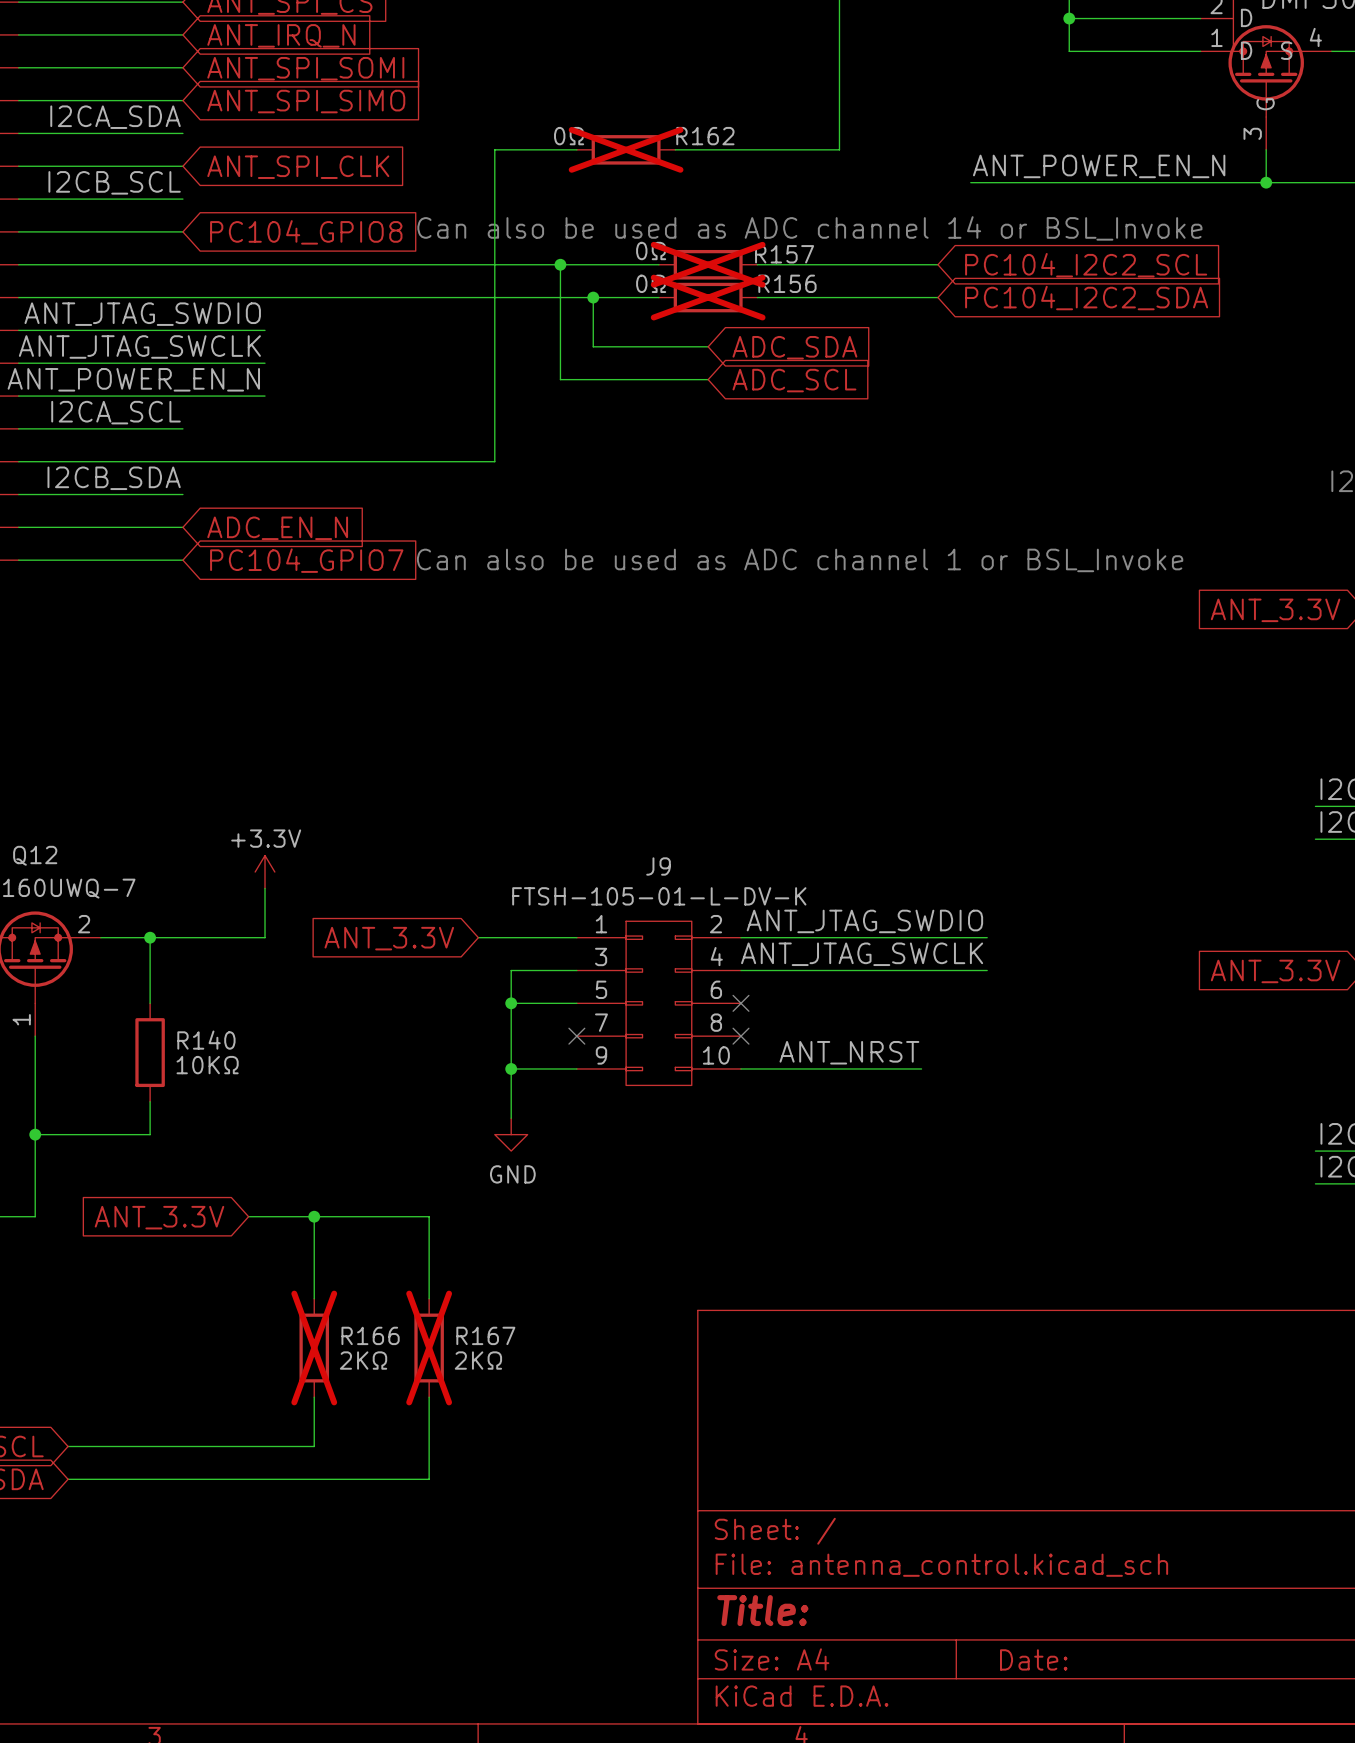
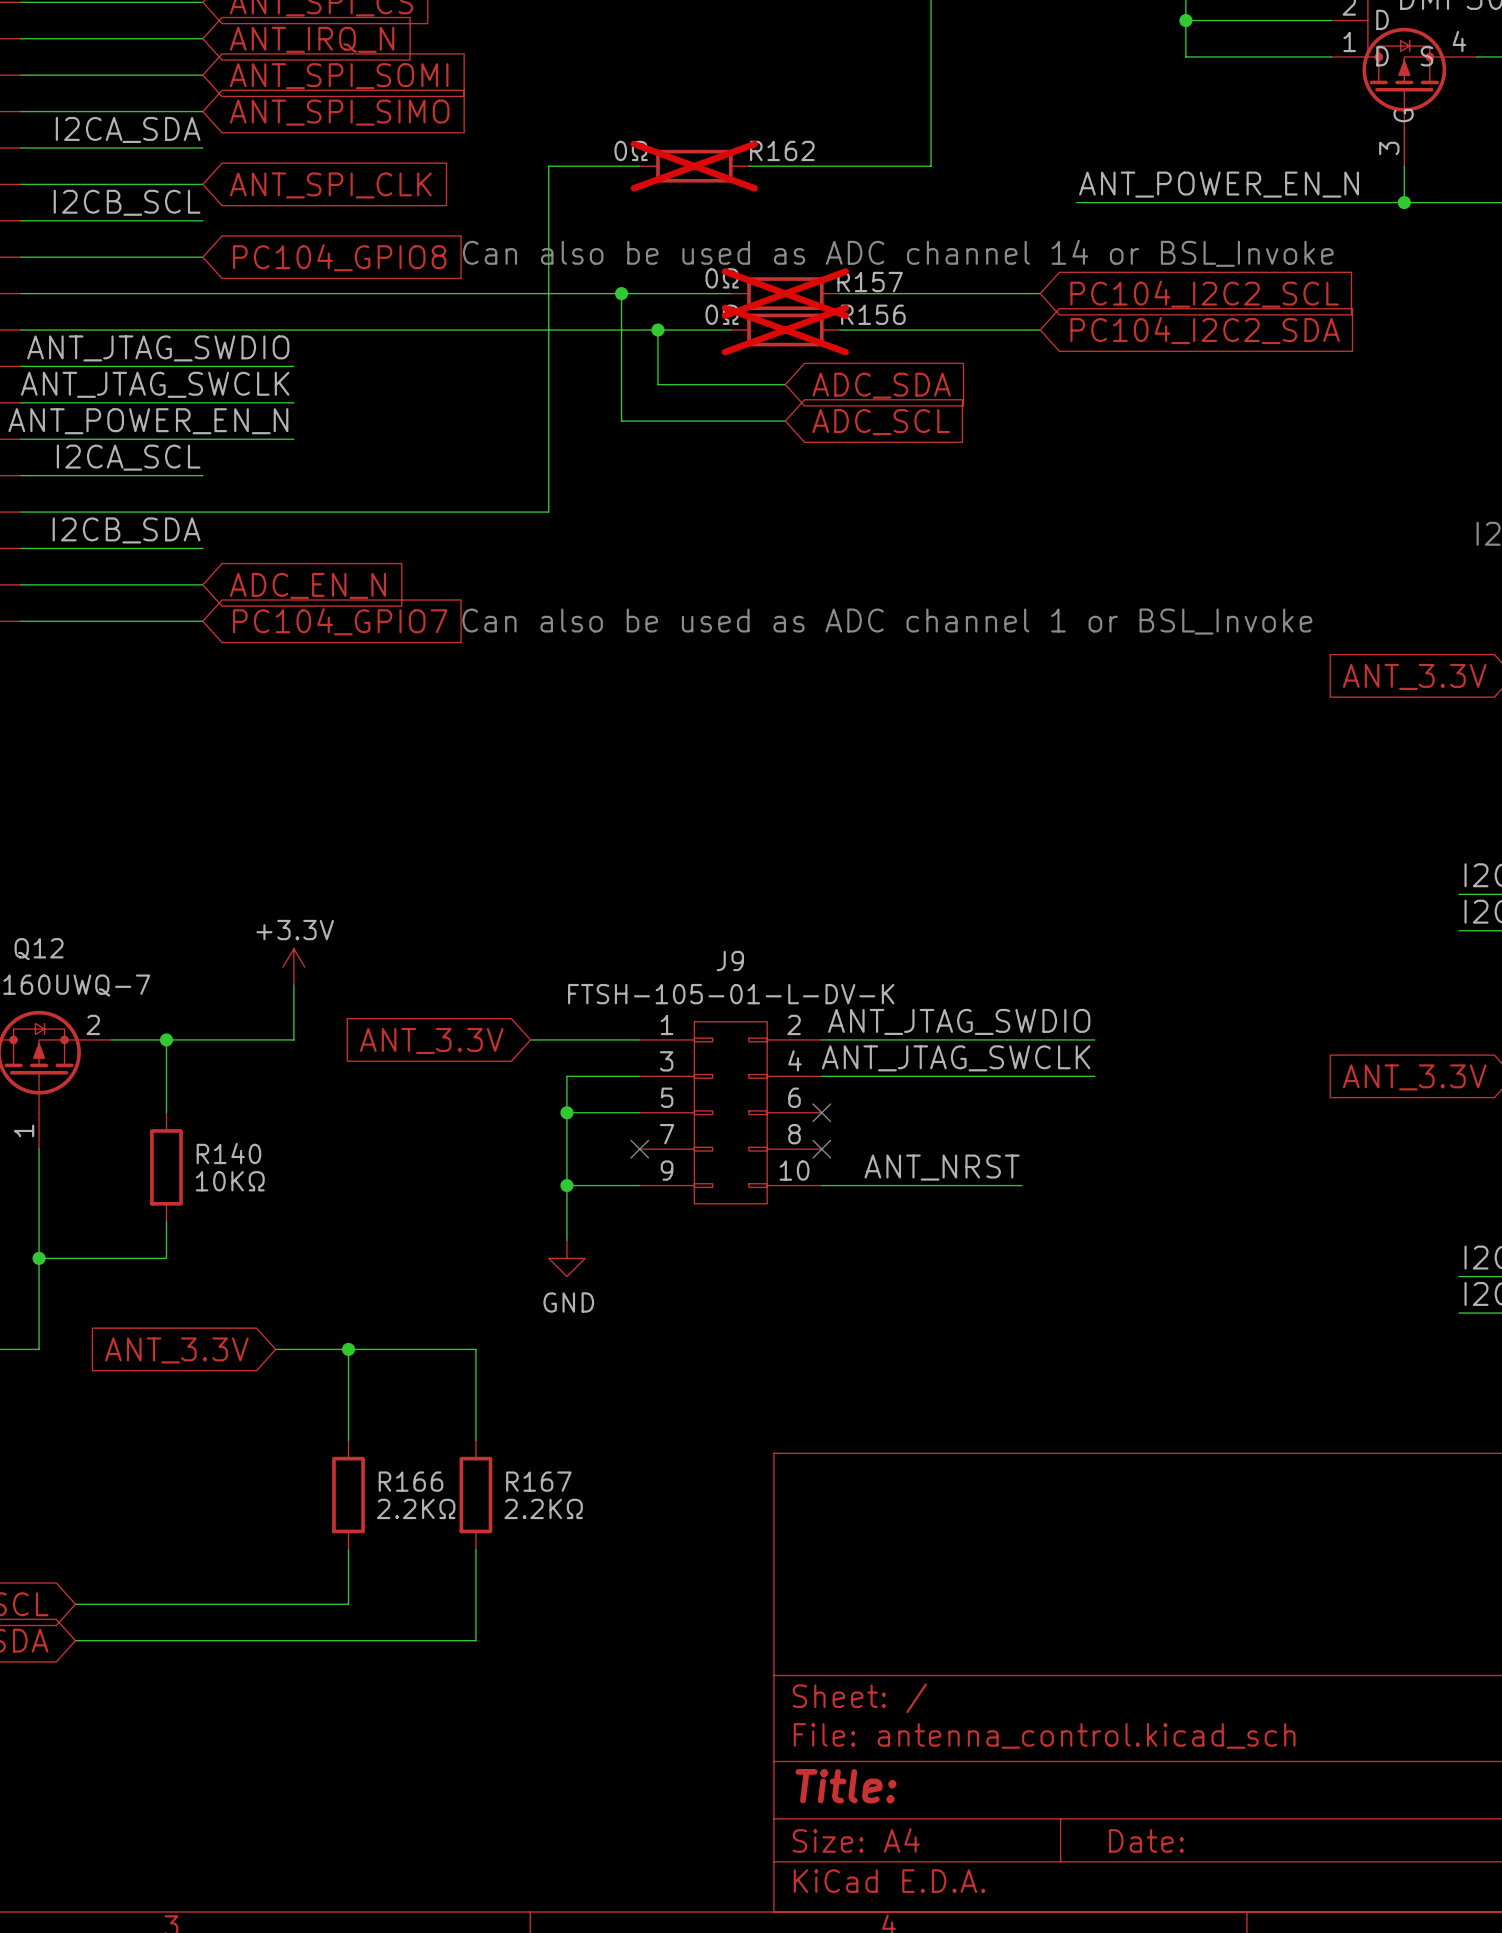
R166 do-not-place cross: (314, 1348) -> none
R167 do-not-place cross: (429, 1348) -> none
R166 value: 2KΩ (363, 1360) -> 2.2KΩ (416, 1508)
R167 value: 2KΩ (478, 1360) -> 2.2KΩ (543, 1508)

